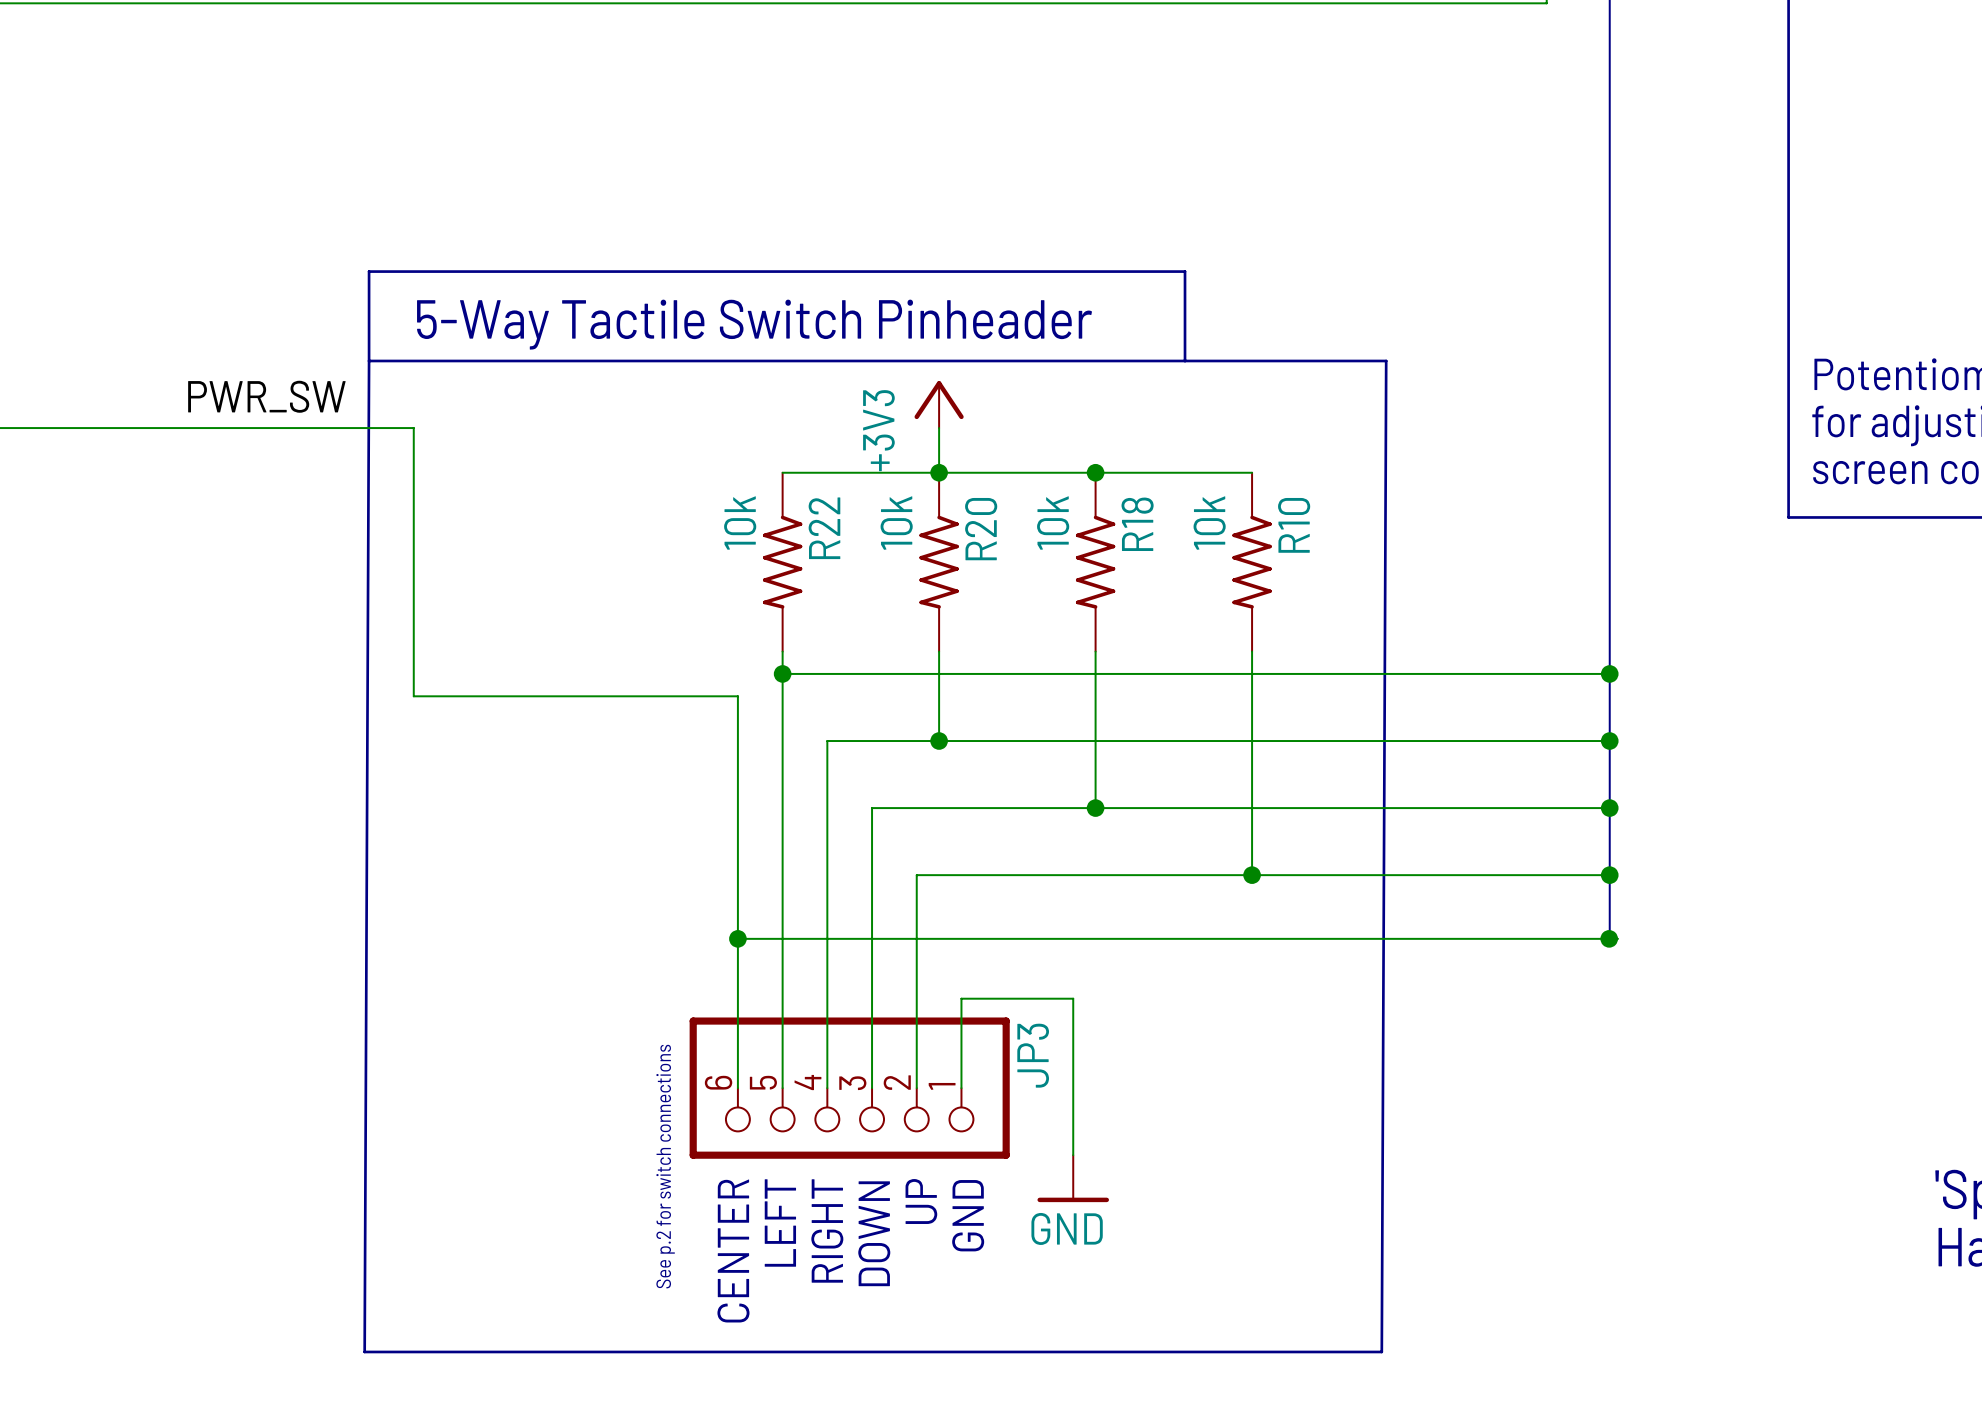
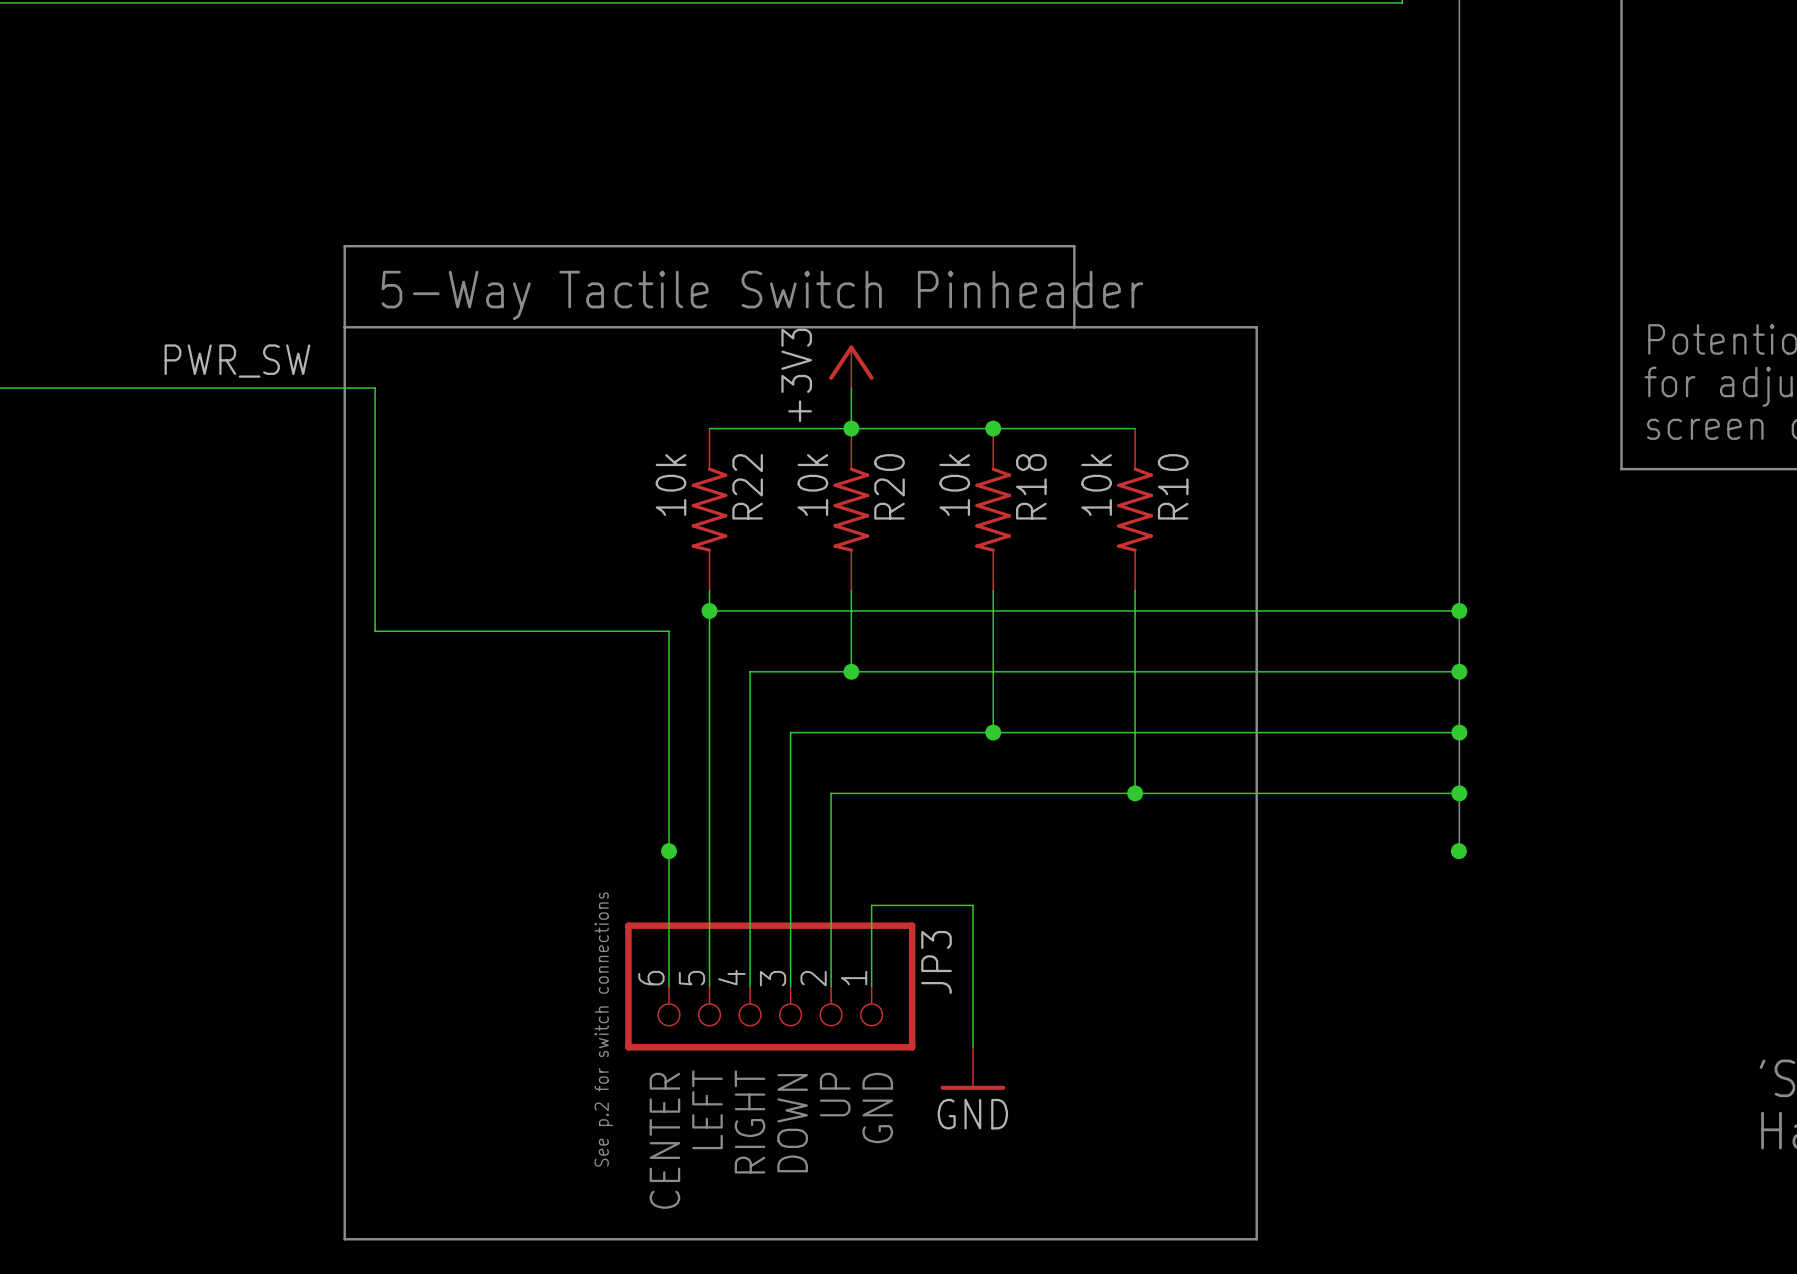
line: (380, 271) (369, 271) (369, 360) -> none
line: (369, 360) (364, 1351) (1381, 1351) (1386, 360) -> (344, 246) (344, 1239) (1256, 1239) (1256, 327)
line: (369, 360) (380, 360) -> none
wire: (737, 938) (1618, 938) -> none

